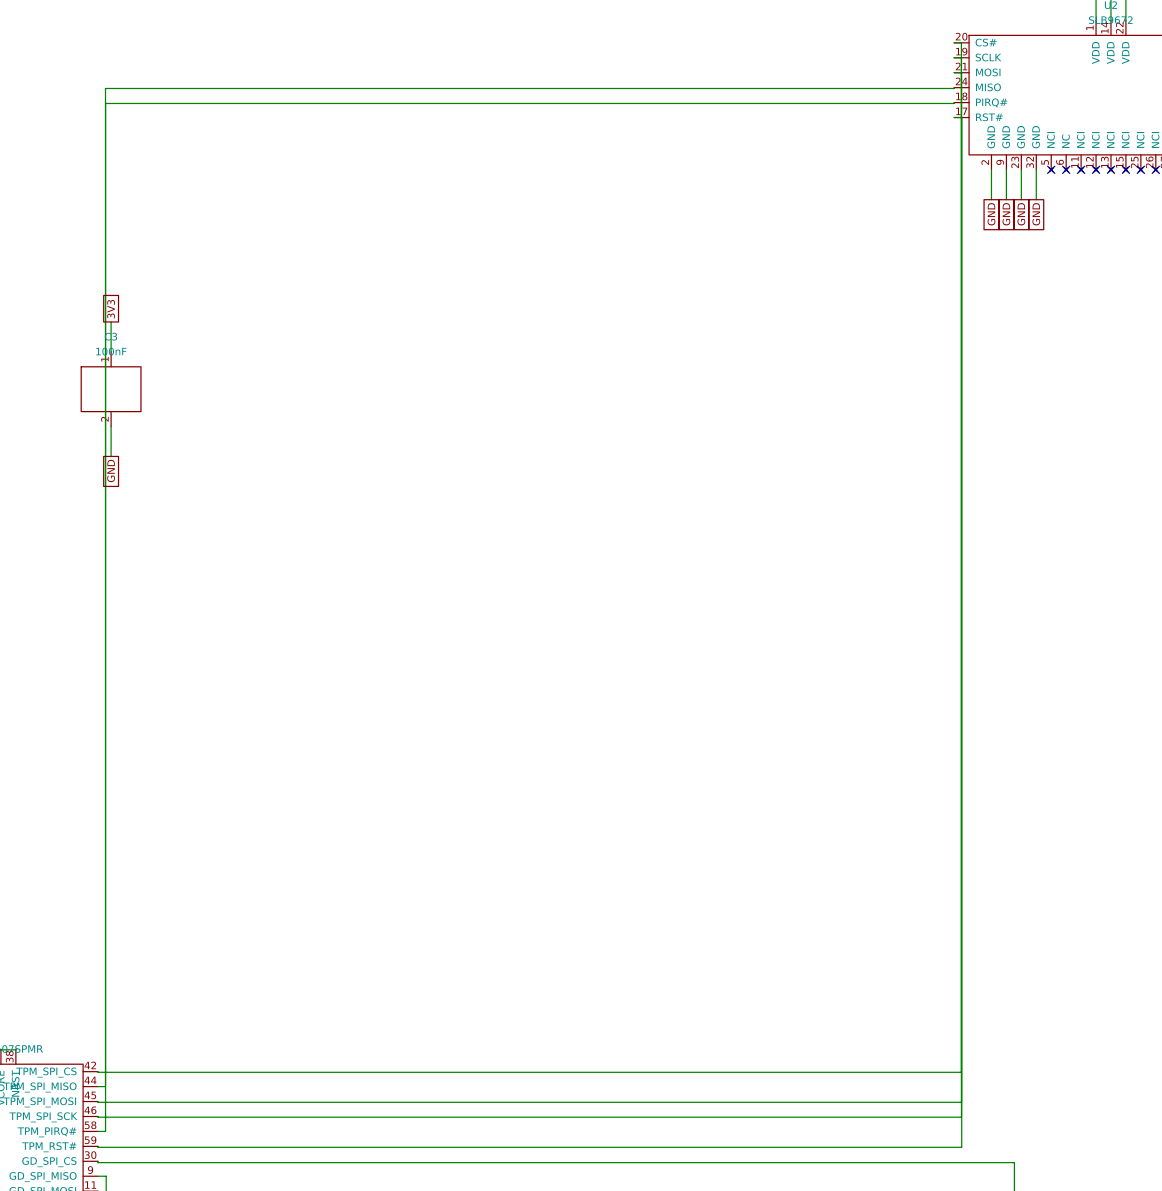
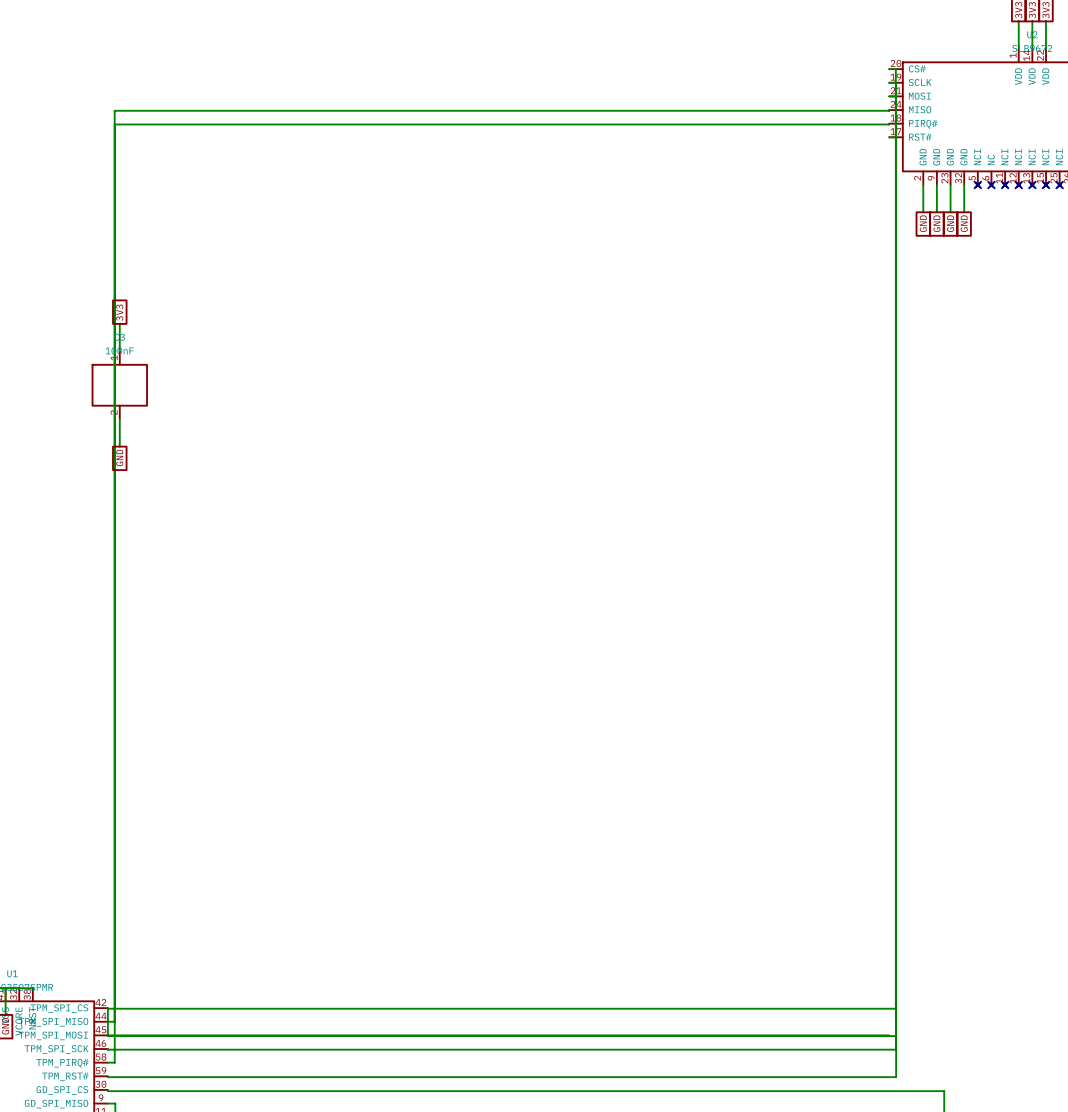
wire: none -> (107, 1008) (107, 1035) (889, 1035)

